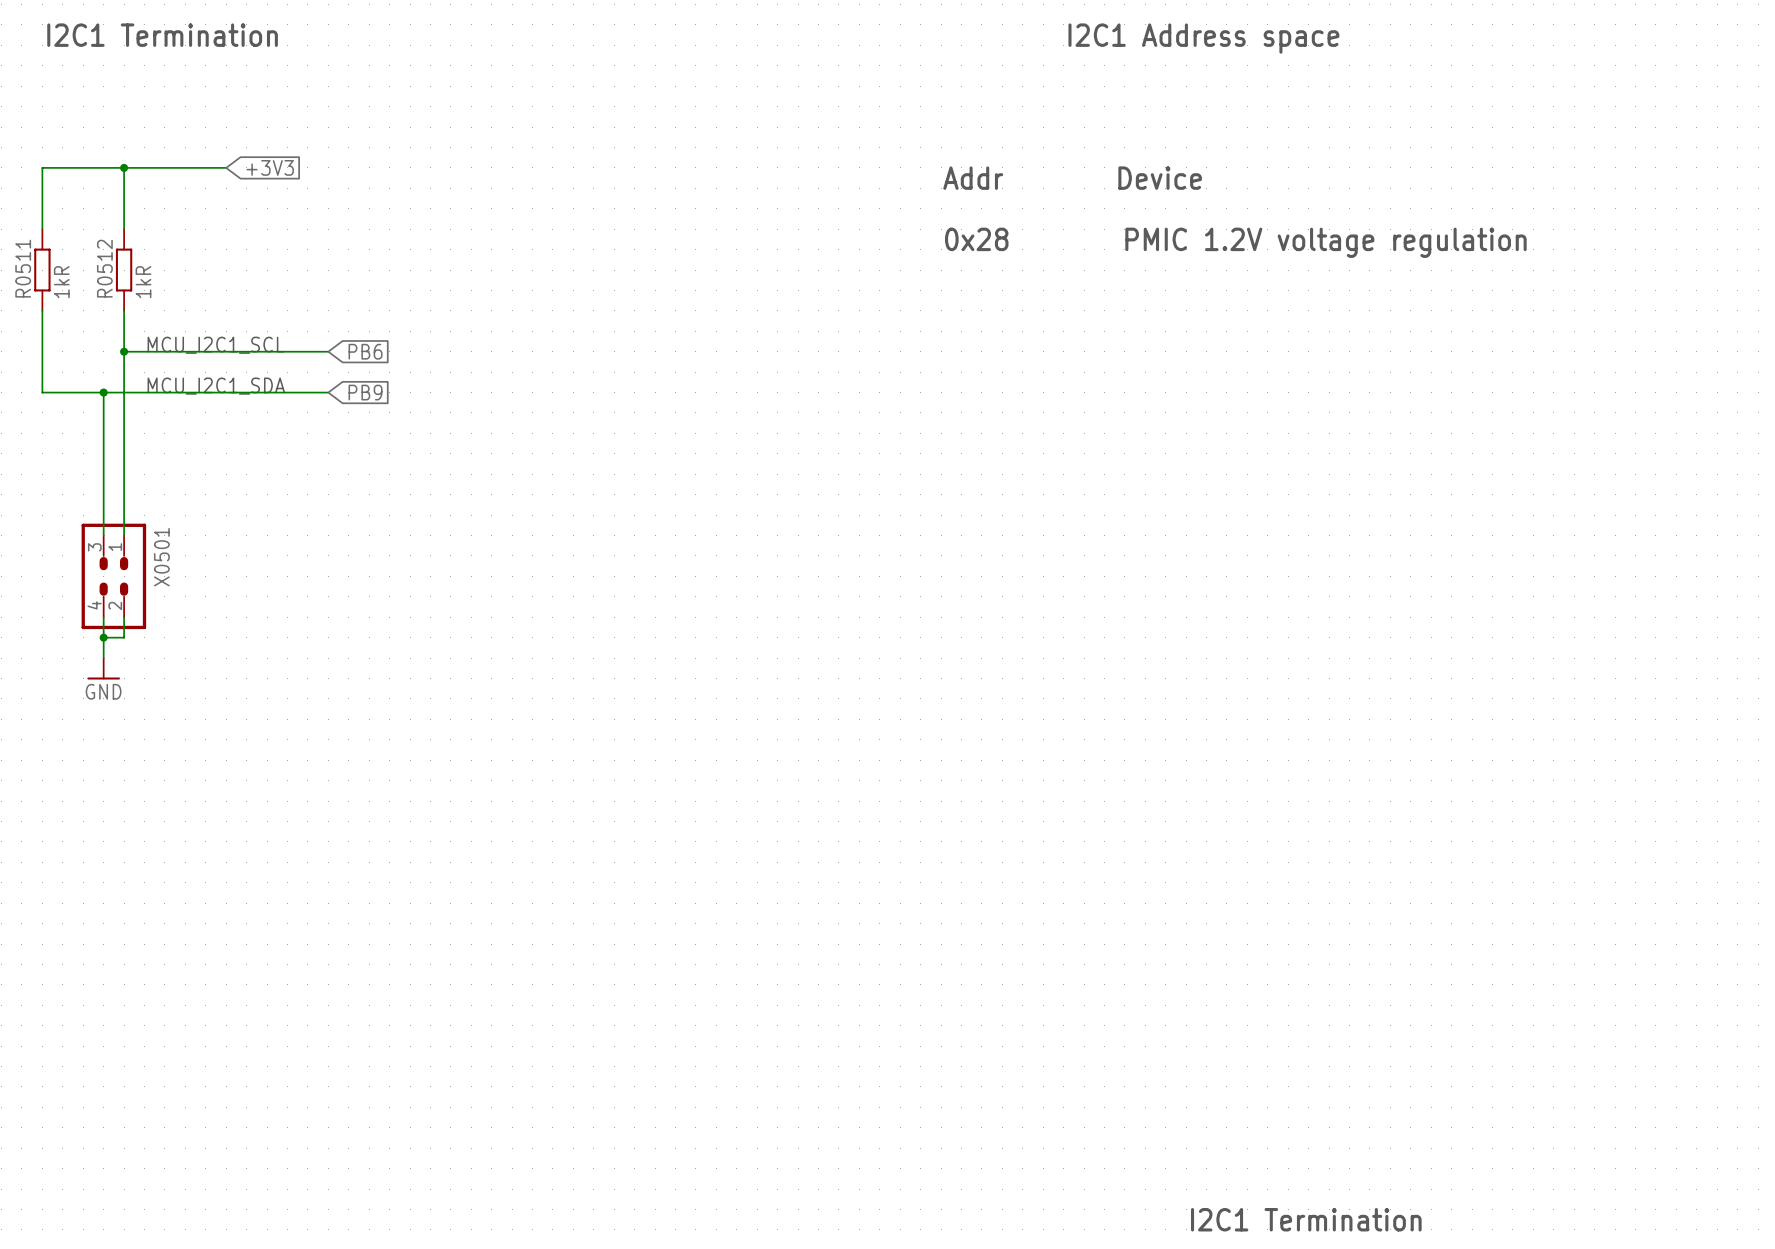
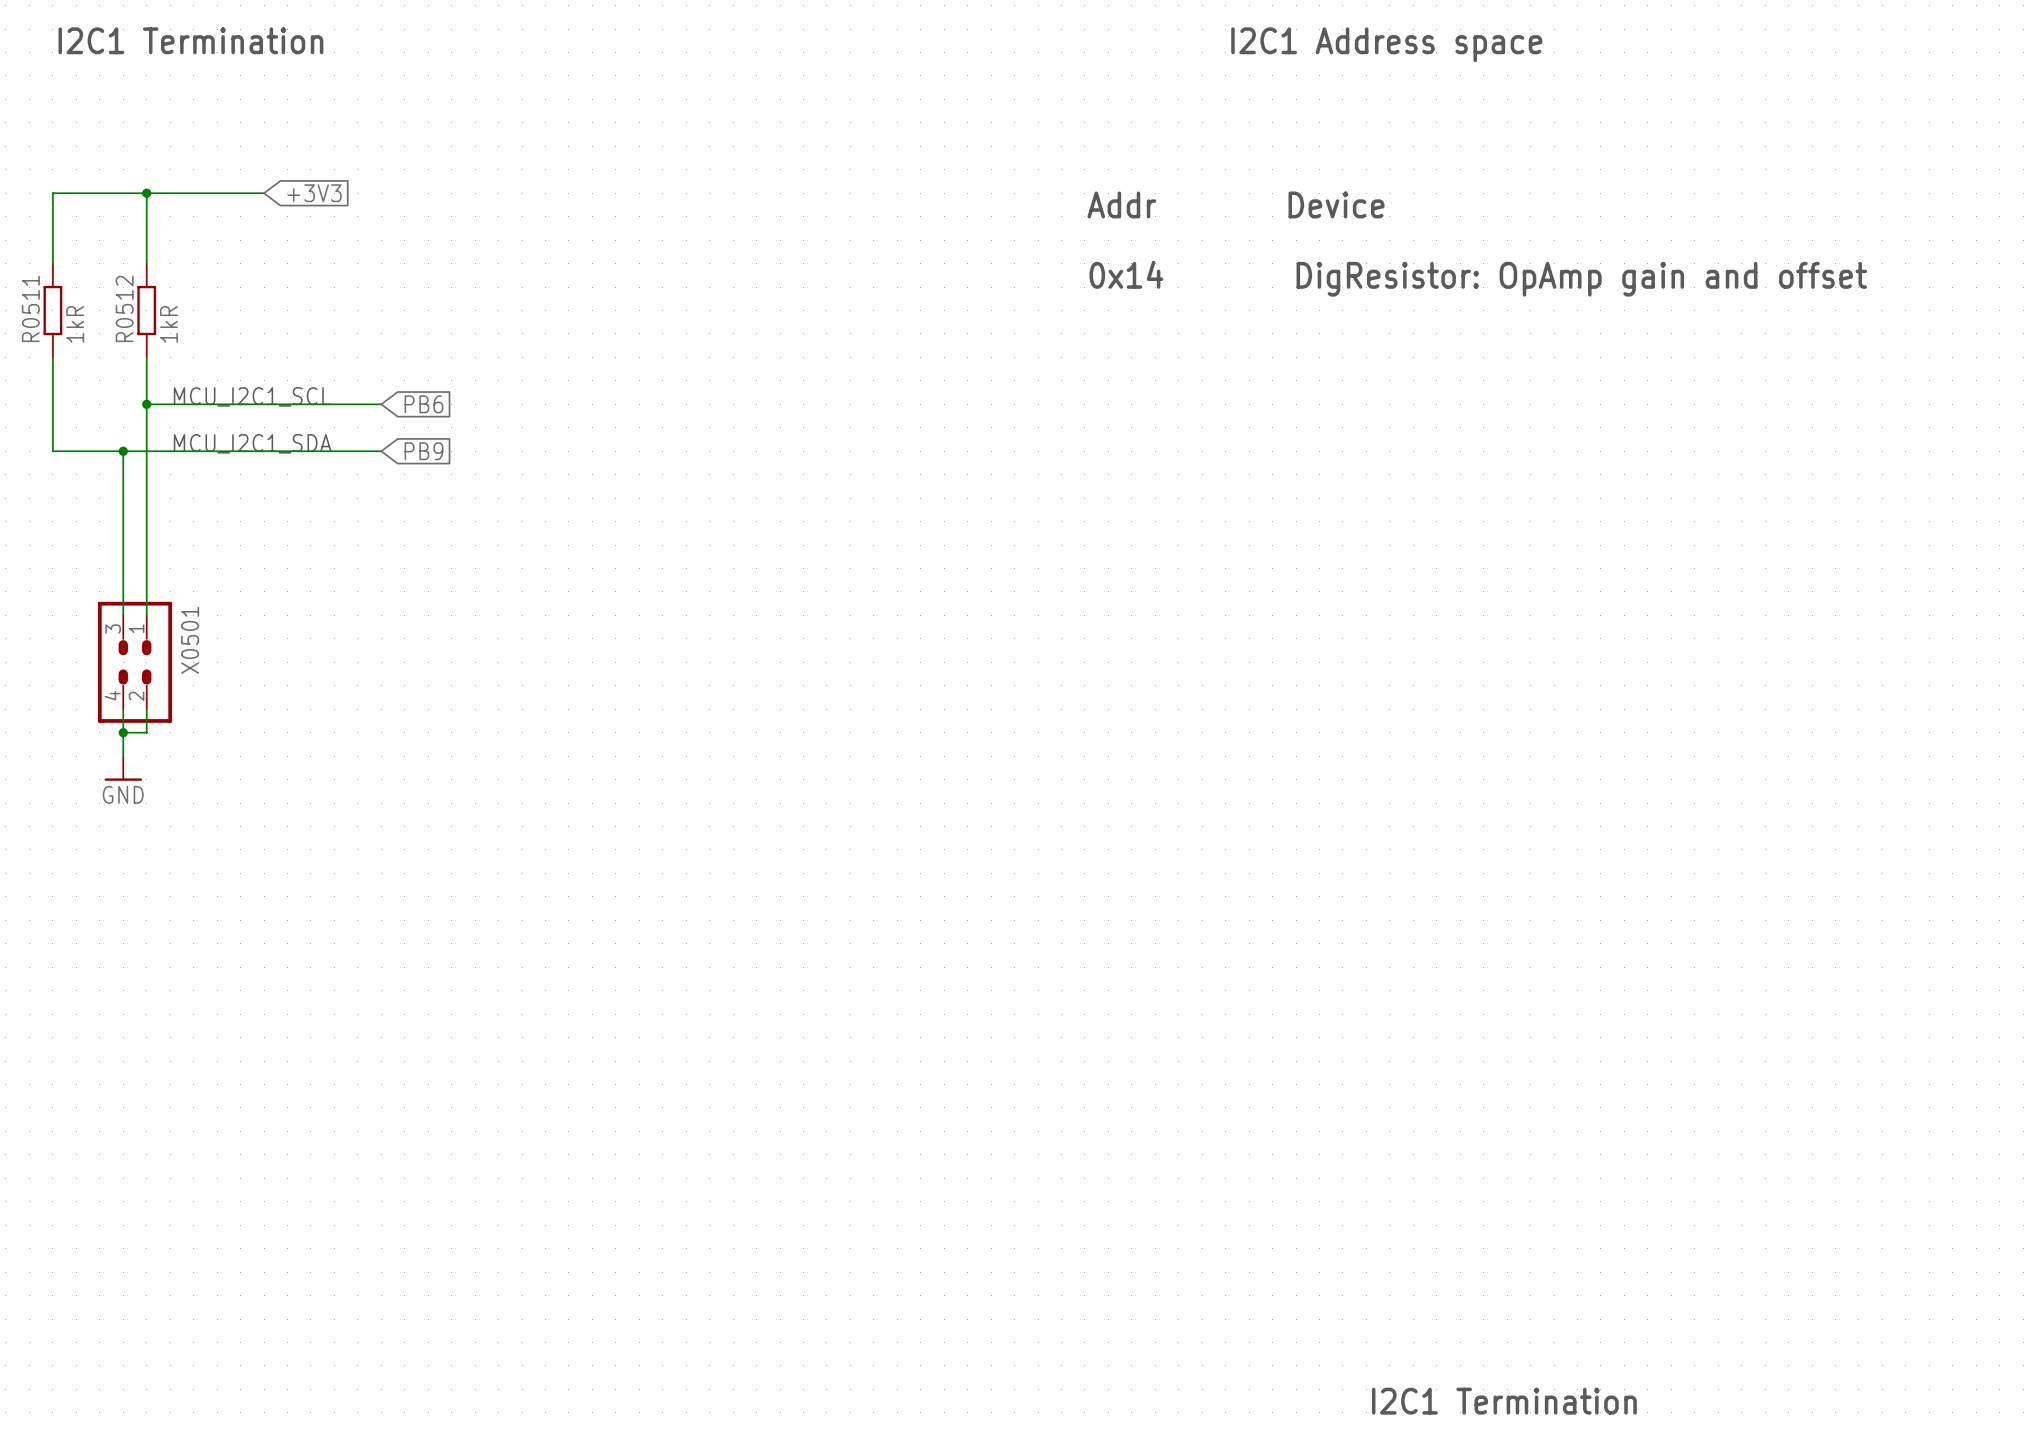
text: 0x28 PMIC 1.2V voltage regulation (1235, 242) -> 0x14 DigResistor: OpAmp gain and offset (1478, 278)

